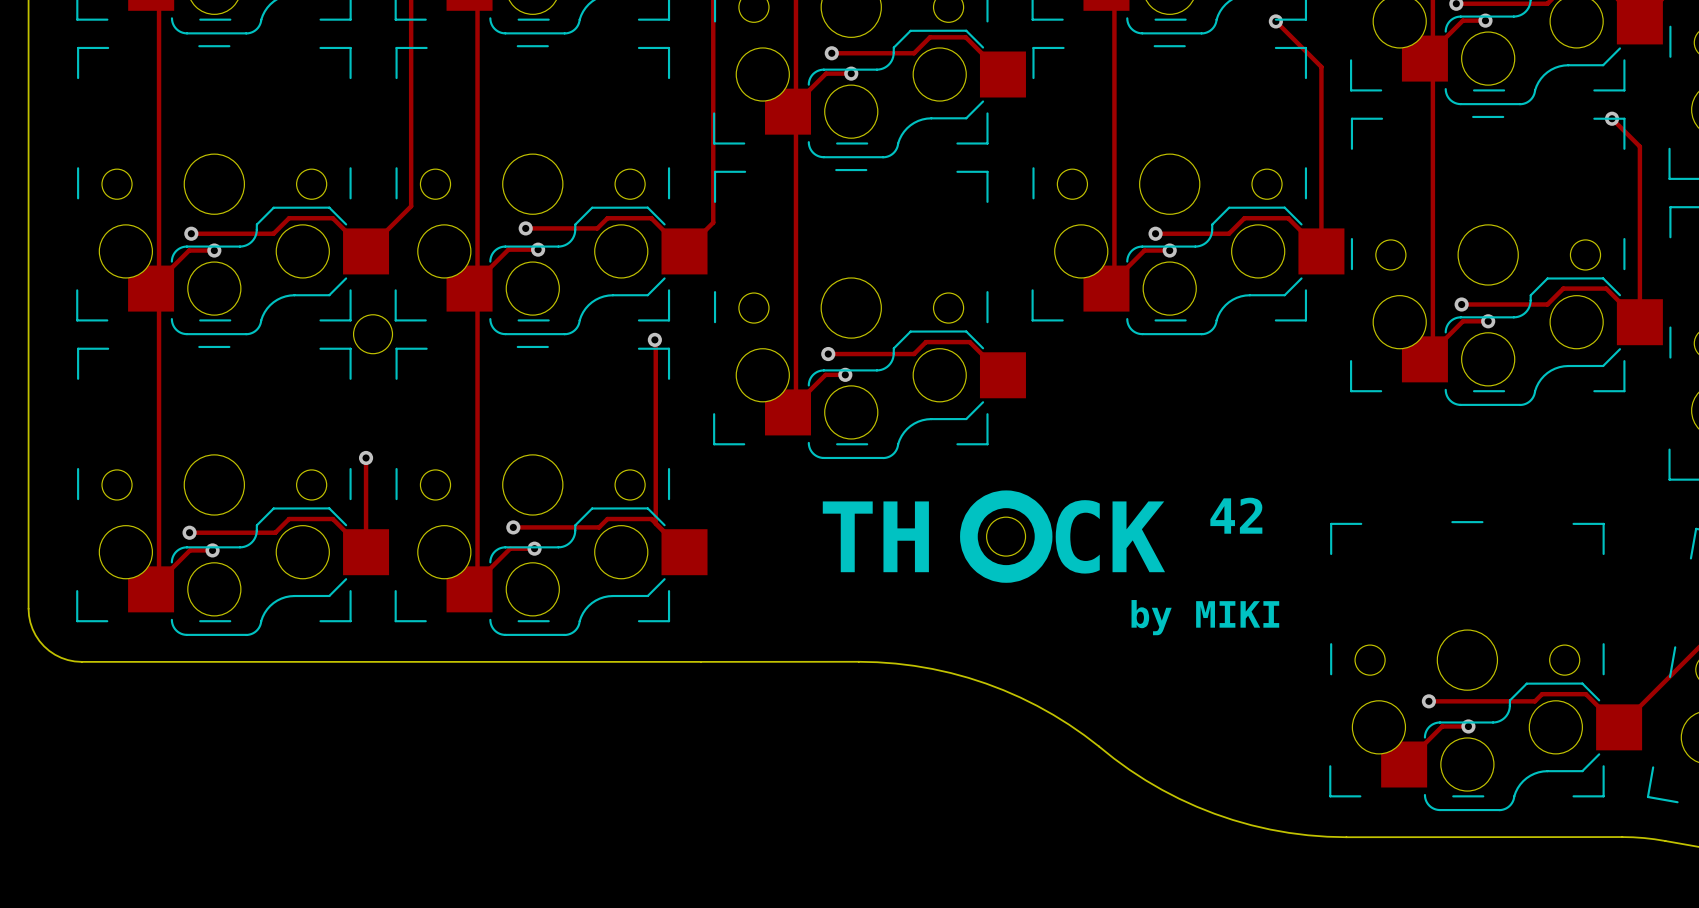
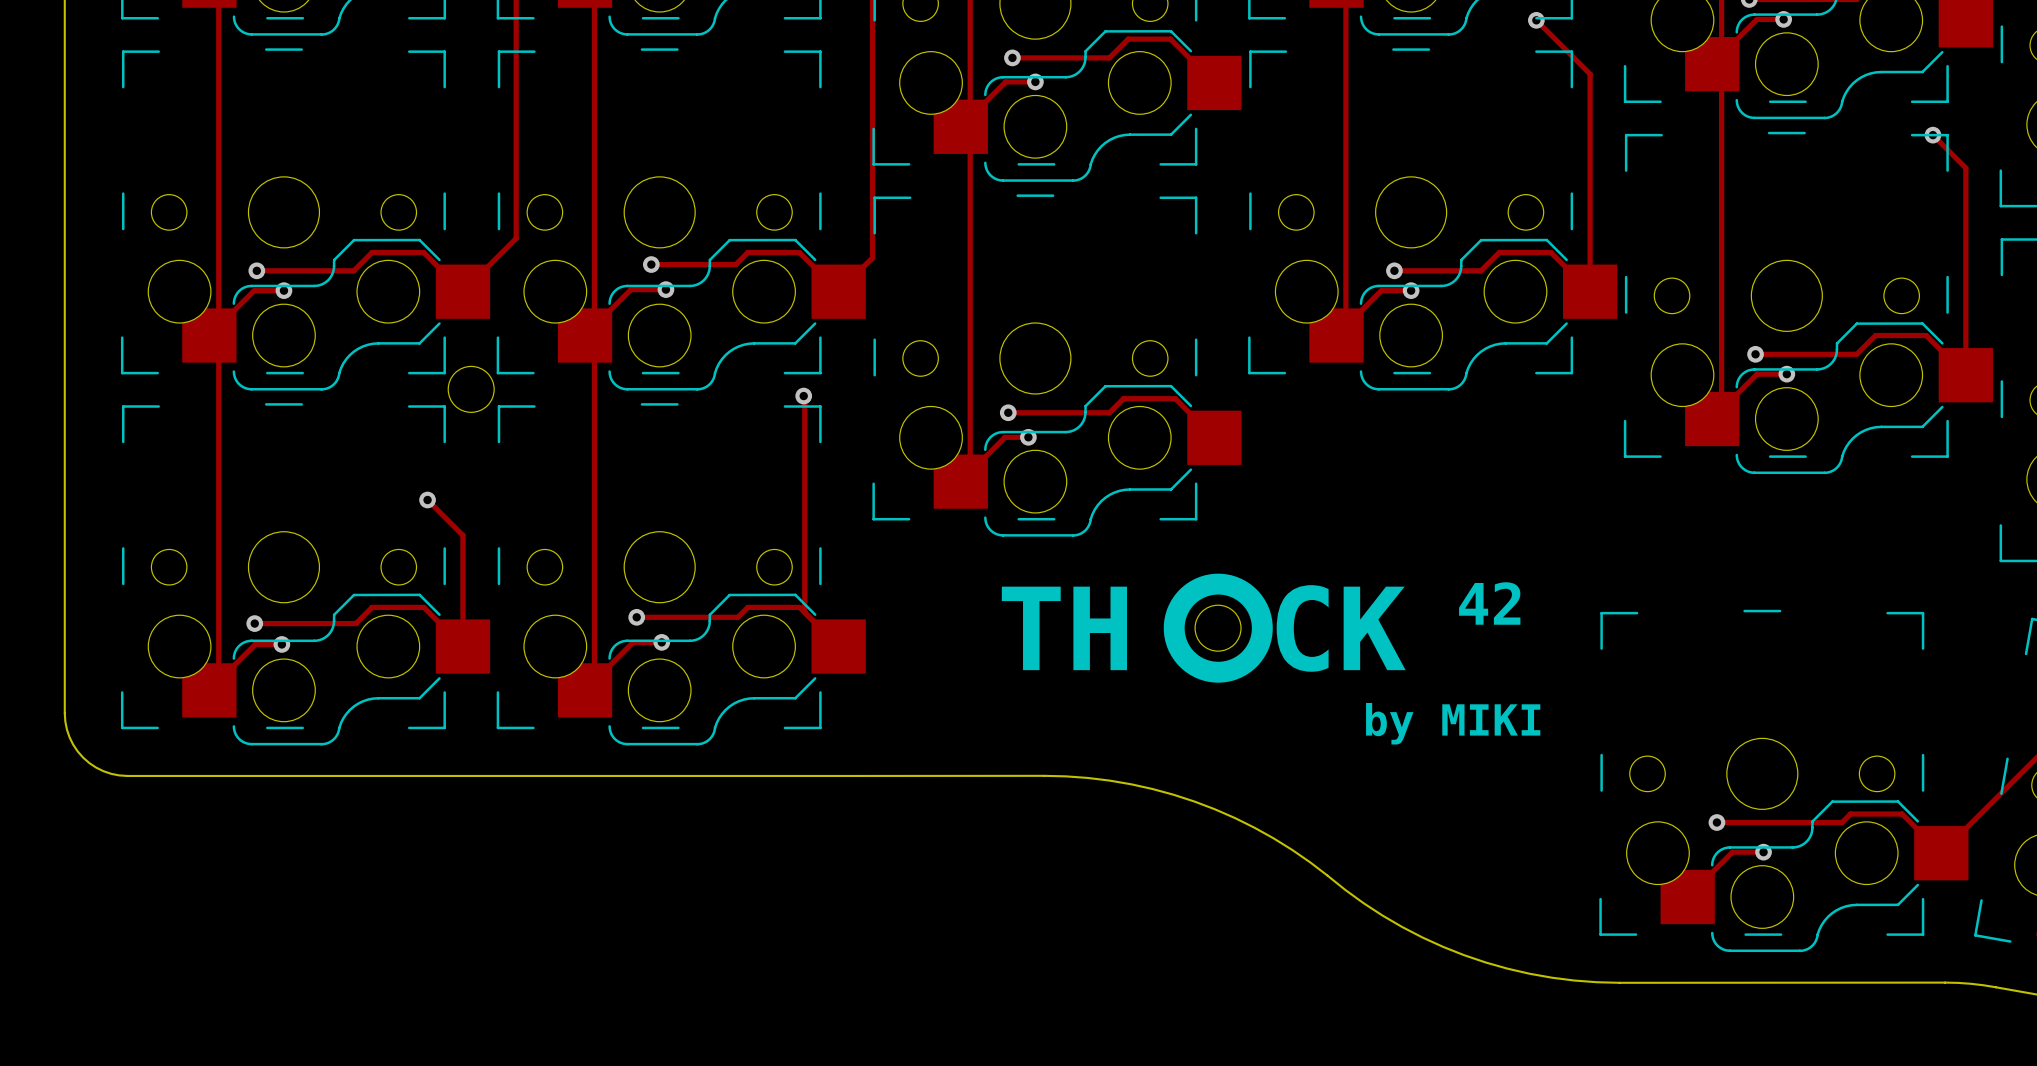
track: none -> (427, 500) (462, 535)
via position: (366, 457) -> (427, 500)

